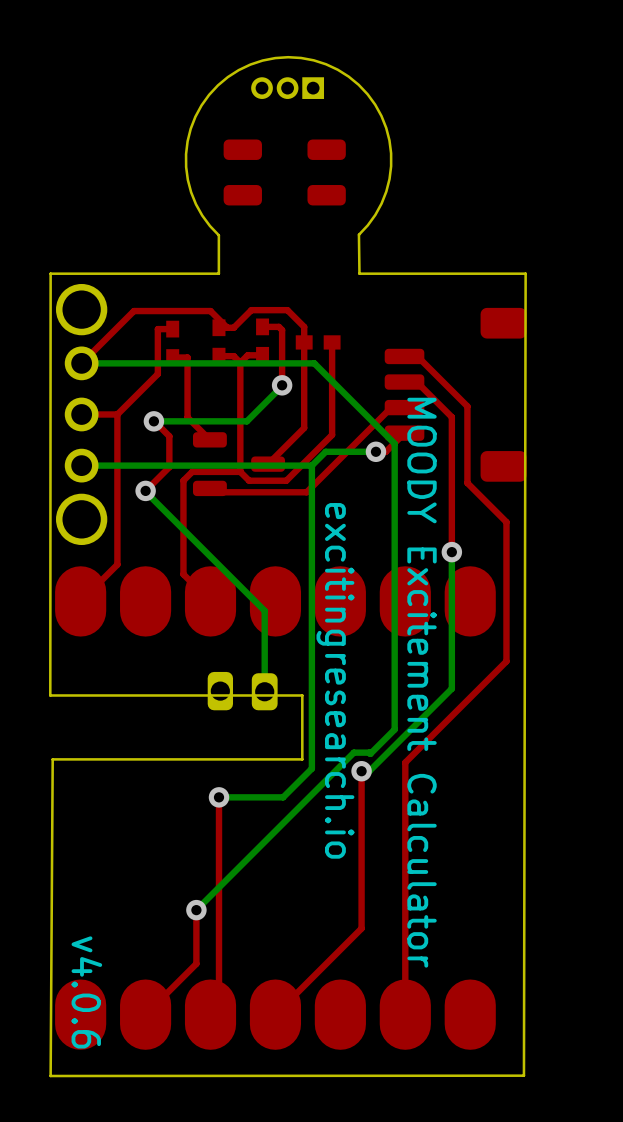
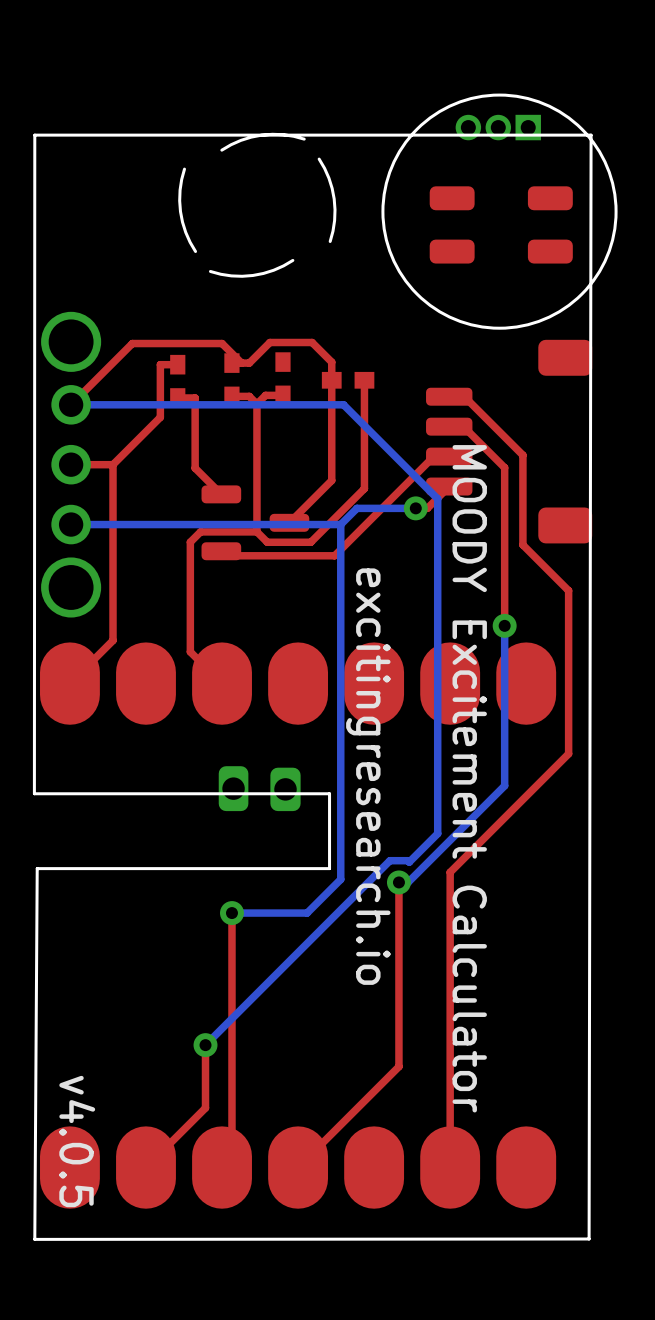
part position: (287, 88) -> (498, 127)
round board edge: none -> [381, 93, 618, 330]
board edge: none -> (304, 139) (283, 134) (261, 135) (240, 140) (221, 150)
board edge: none -> (319, 159) (328, 178) (334, 199) (334, 220) (330, 241)
board edge: none -> (184, 169) (180, 190) (180, 211) (185, 232) (195, 251)
part position: (284, 172) -> (501, 224)
board edge: none -> (292, 260) (273, 270) (252, 275) (231, 275) (210, 271)
top track: (262, 326) (278, 326) (282, 330) (282, 385) -> none
bottom track: (282, 385) (246, 421) (153, 421) -> none
via: (282, 385) -> none
via: (153, 421) -> none
top track: (154, 421) (169, 436) (169, 467) (145, 490) -> none
via: (145, 490) -> none
bottom track: (145, 491) (264, 610) (264, 691) -> none
board edge: (50, 695) (50, 273) (218, 273) (218, 235) (202, 215) (195, 204) (187, 179) (186, 154) (187, 141) (195, 116) (209, 94) (217, 85) (227, 77) (250, 64) (262, 60) (288, 57) (313, 60) (326, 64) (348, 76) (367, 94) (381, 115) (389, 140) (391, 166) (386, 191) (375, 214) (358, 234) (359, 273) (525, 273) (523, 1075) -> (34, 793) (34, 135) (591, 135) (589, 1239)
text: v4.0.6 (86, 992) -> v4.0.5 (77, 1141)

